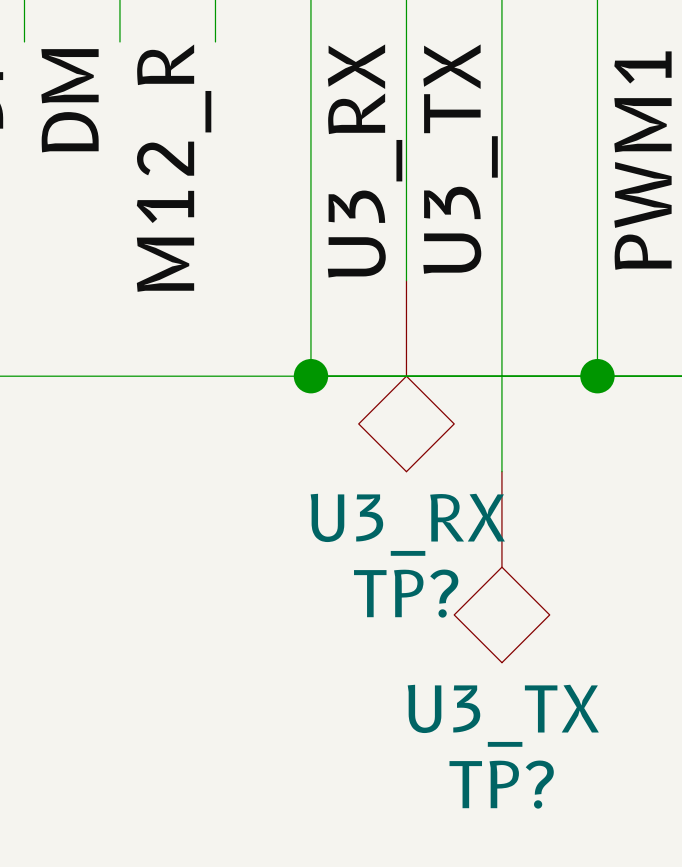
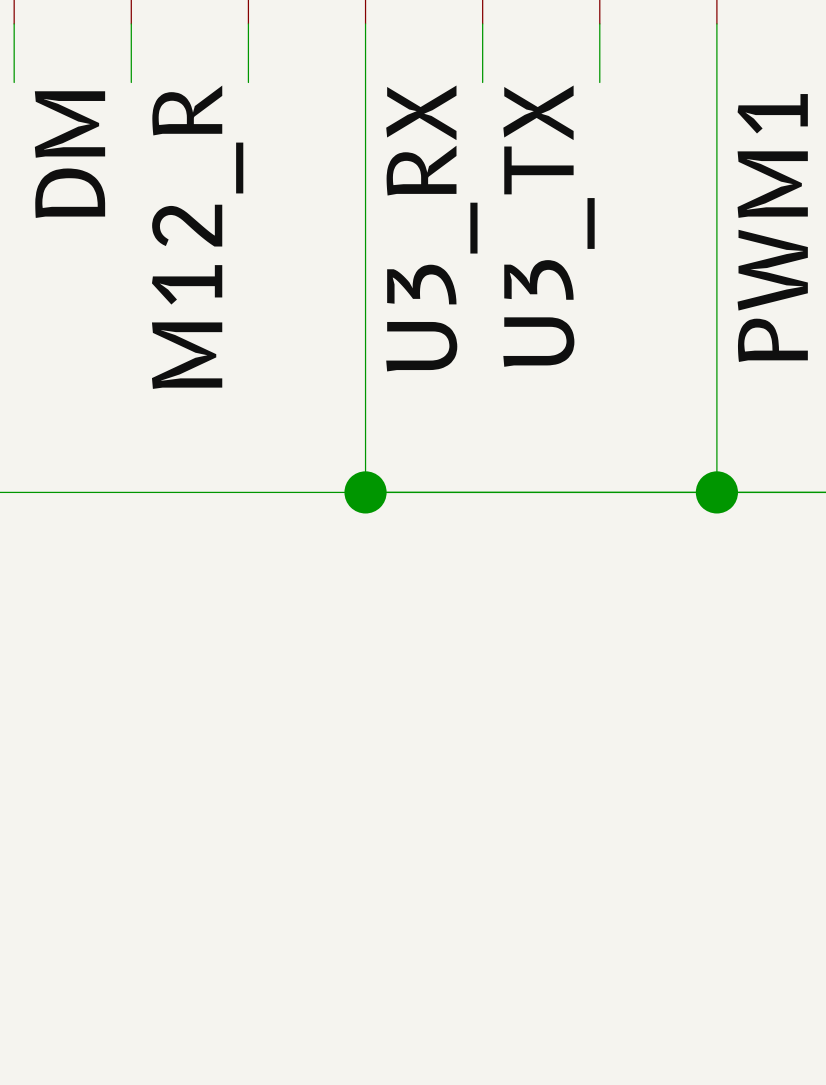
wire: (406, 41) (406, 280) -> none
wire: (501, 41) (501, 471) -> none
TP?: U3_RX (406, 376) -> none
TP?: U3_TX (501, 567) -> none

